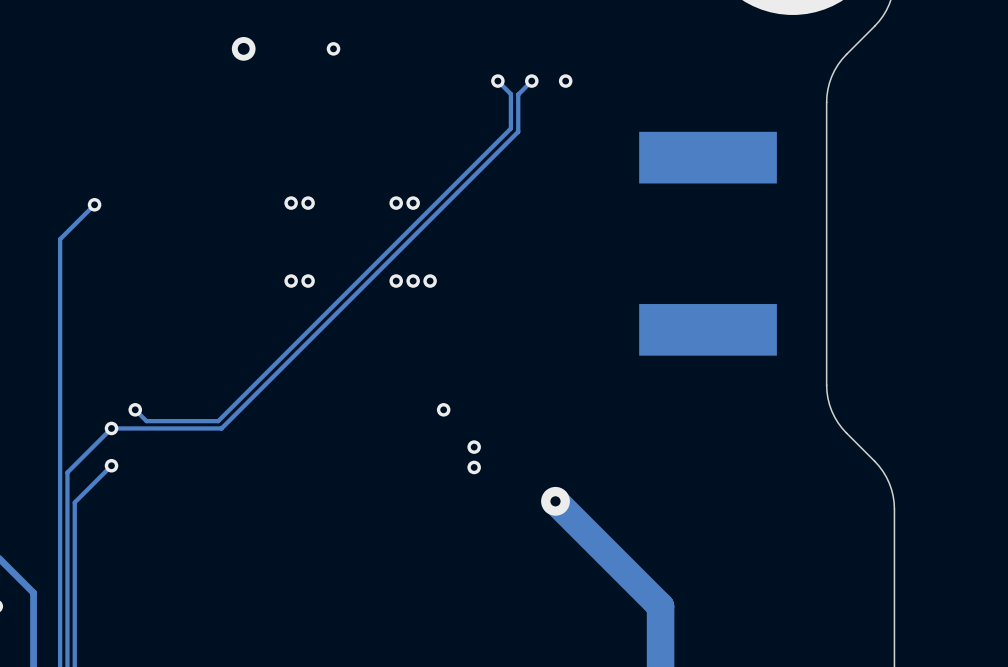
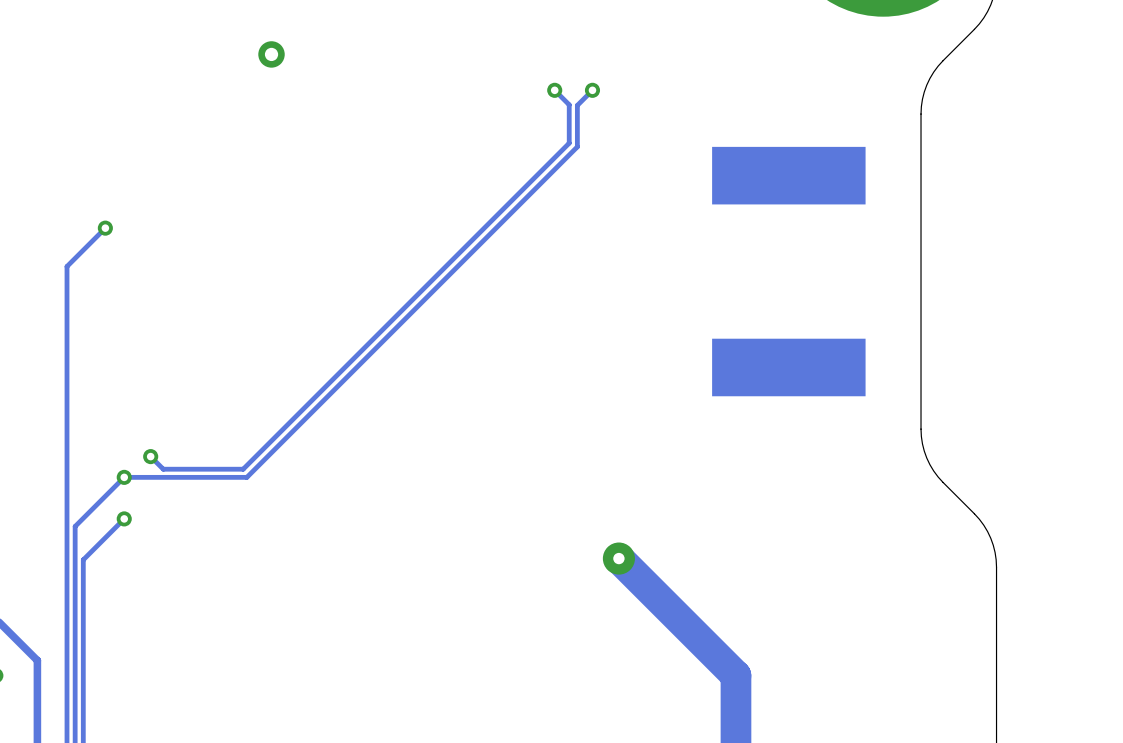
via: (333, 48) -> none
via: (565, 81) -> none
via: (291, 203) -> none
via: (308, 203) -> none
via: (396, 203) -> none
via: (413, 203) -> none
via: (291, 281) -> none
via: (308, 281) -> none
via: (396, 281) -> none
via: (413, 281) -> none
via: (430, 281) -> none
via: (443, 409) -> none
via: (474, 447) -> none
via: (474, 467) -> none

